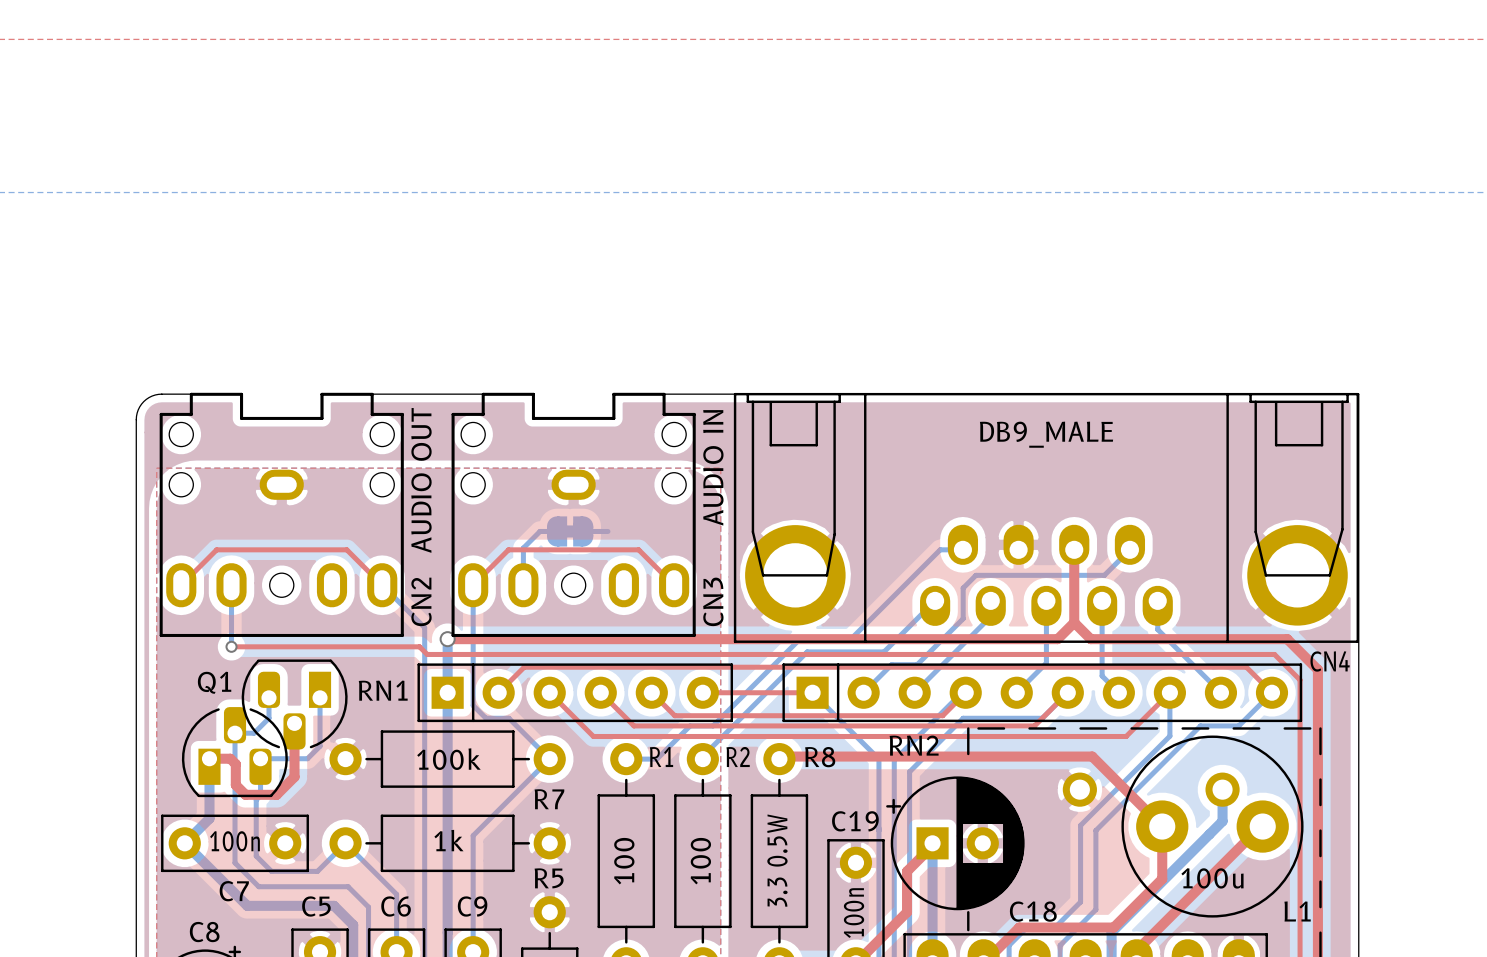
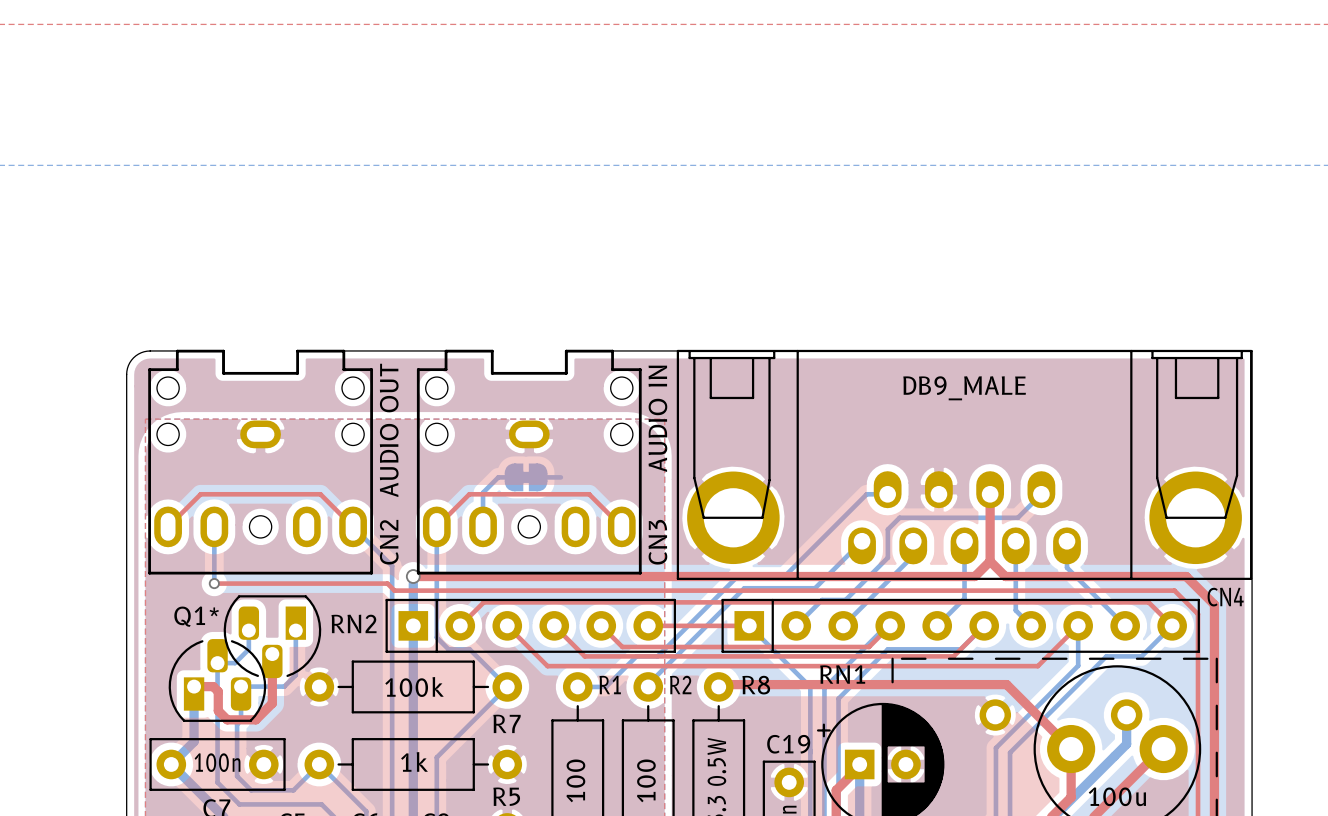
text: none -> Q1* (196, 616)
Q1 name: Q1 (214, 682) -> none
RN1 name: RN1 (383, 690) -> RN2 (354, 623)
RN2 name: RN2 (914, 745) -> RN1 (842, 674)

